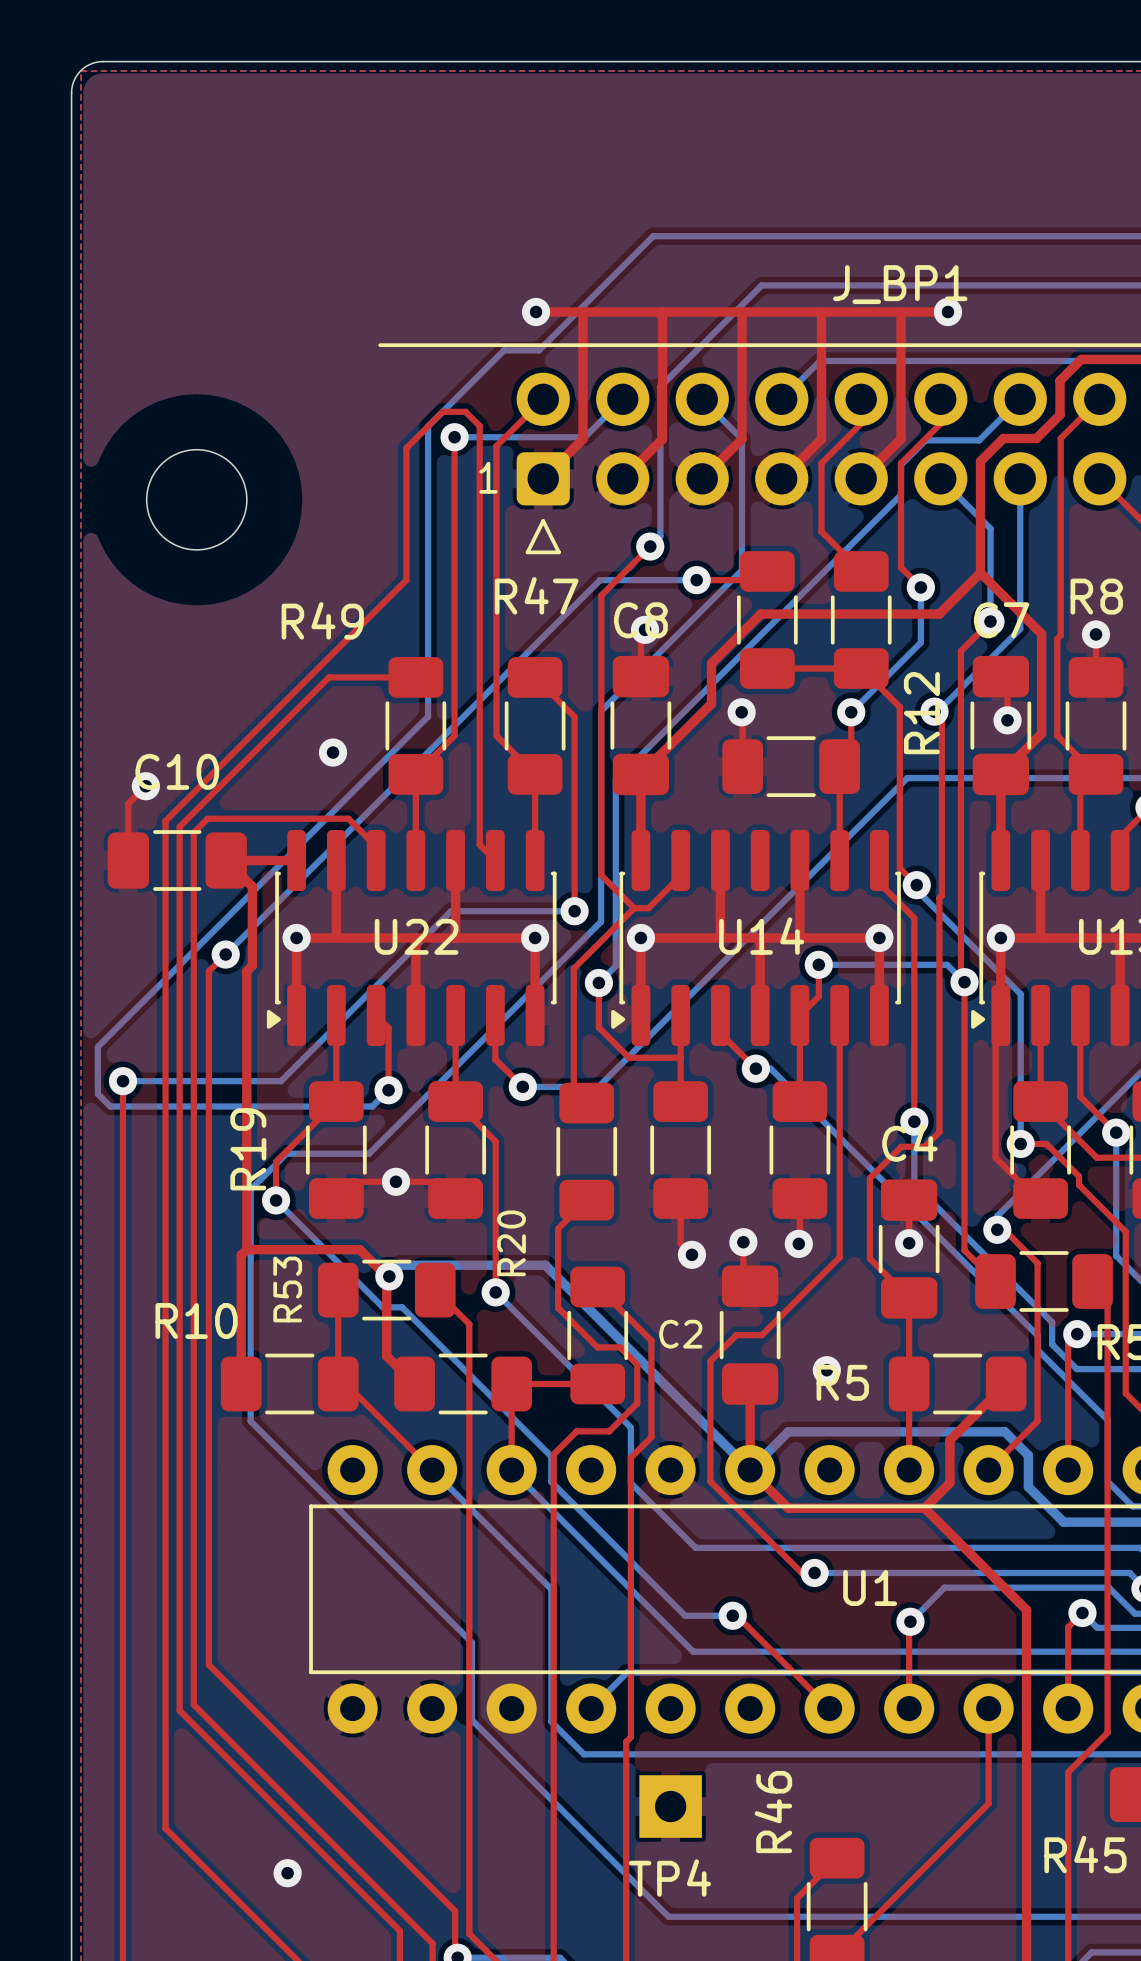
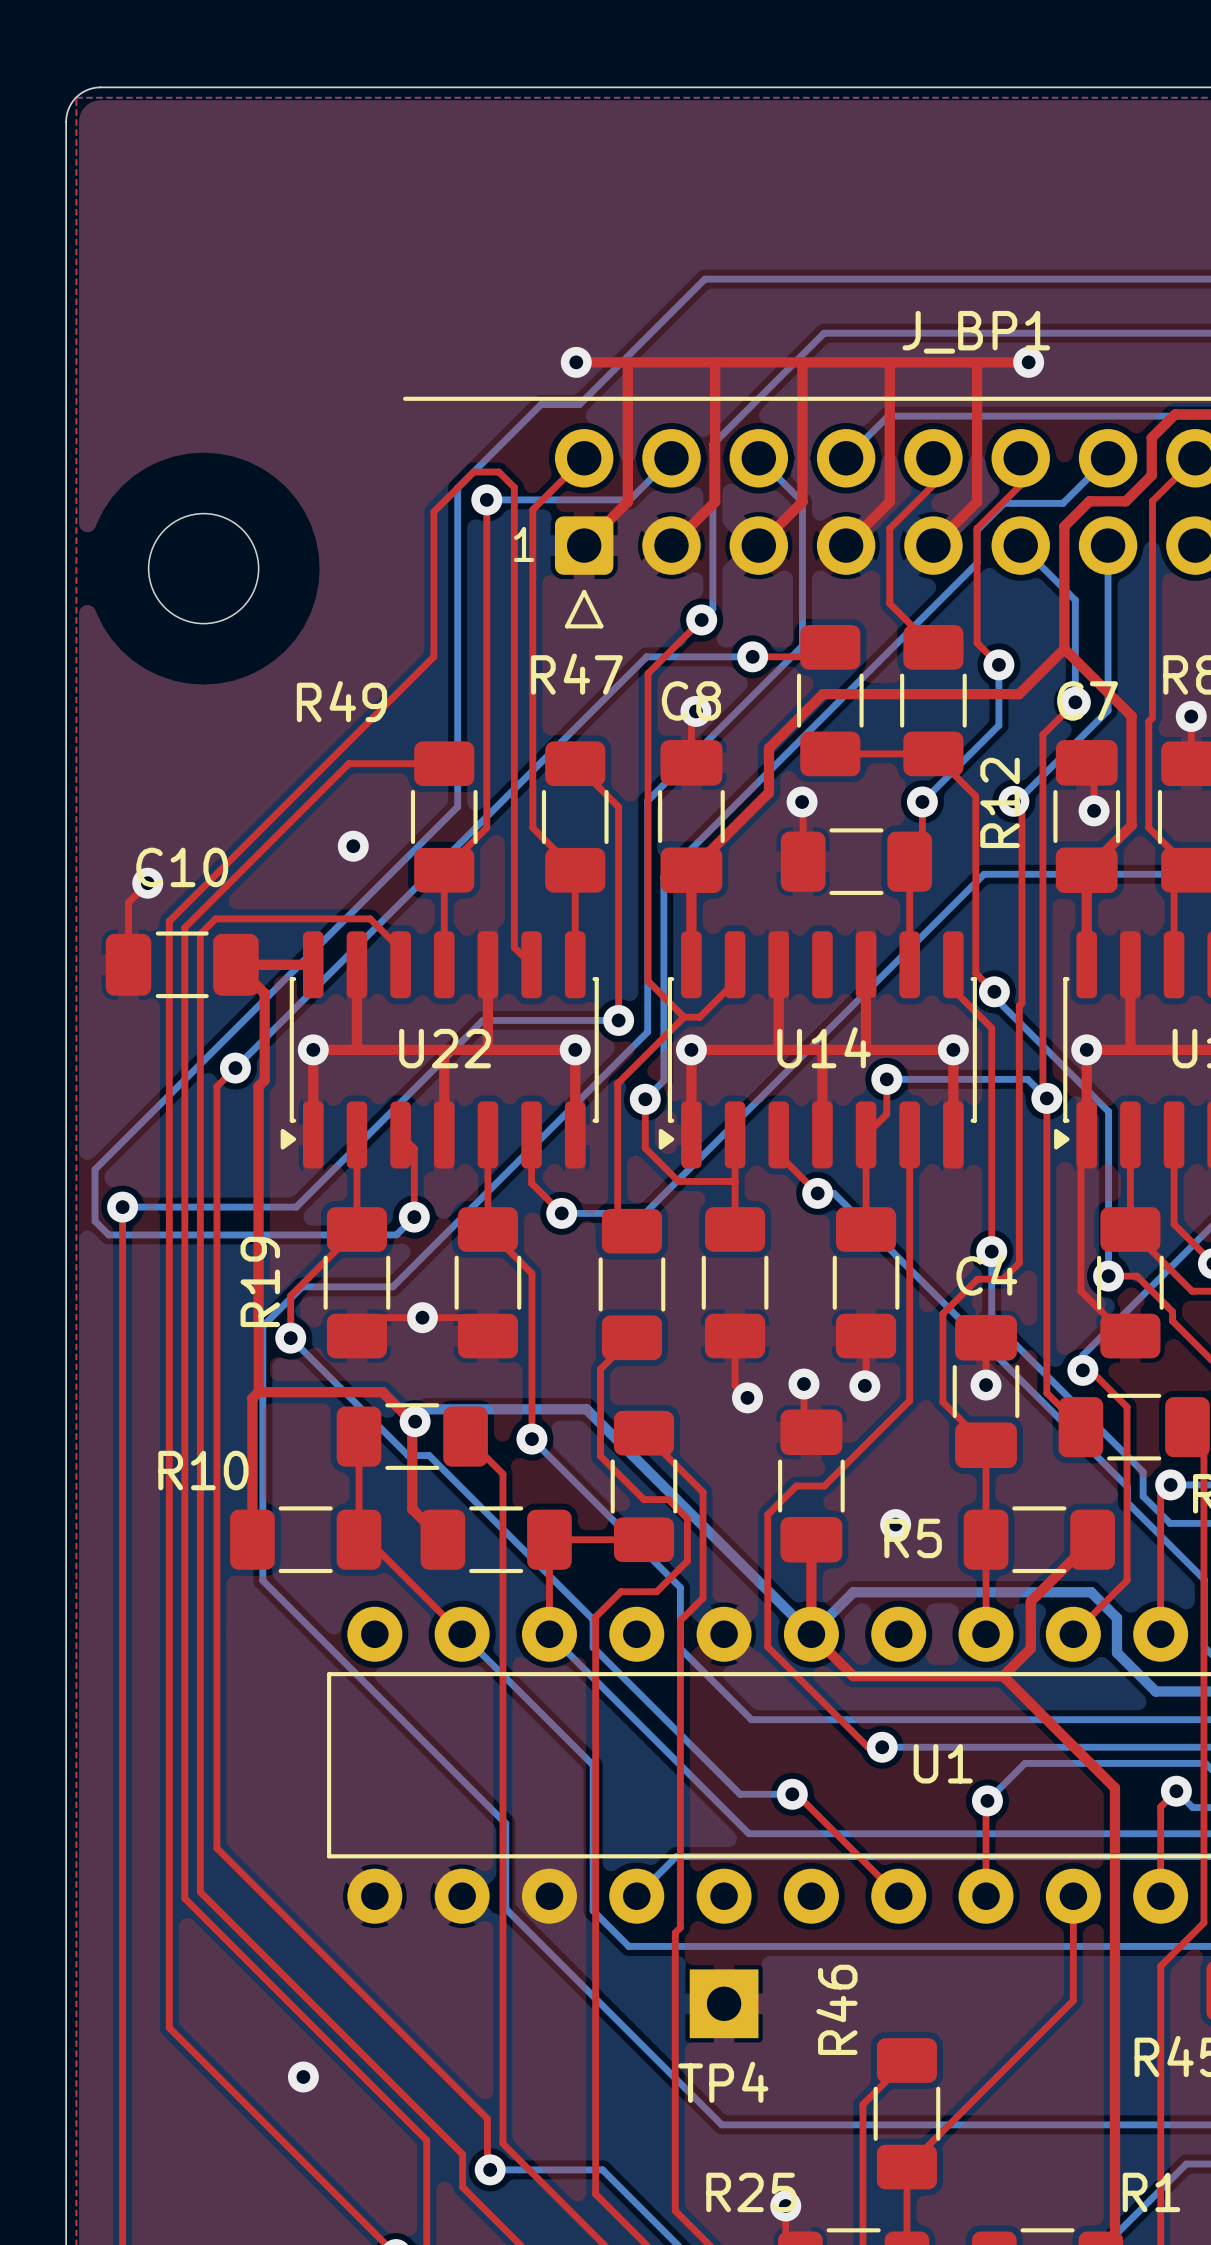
R20 name: R20 (511, 1243) -> none
R53 name: R53 (287, 1289) -> none
C2 name: C2 (680, 1334) -> none

